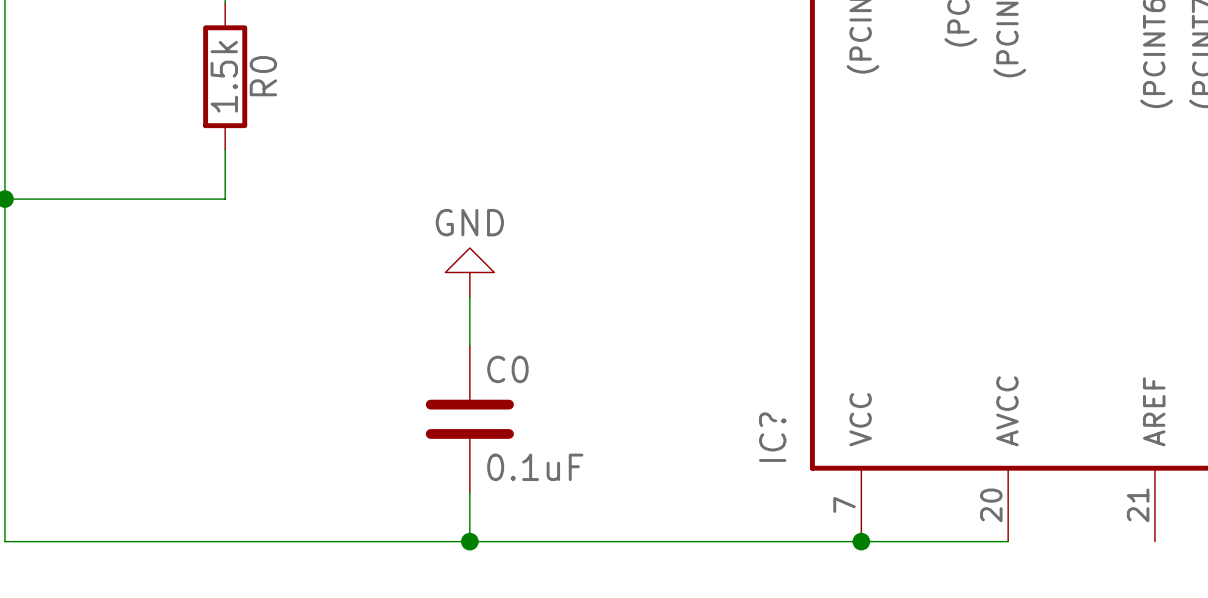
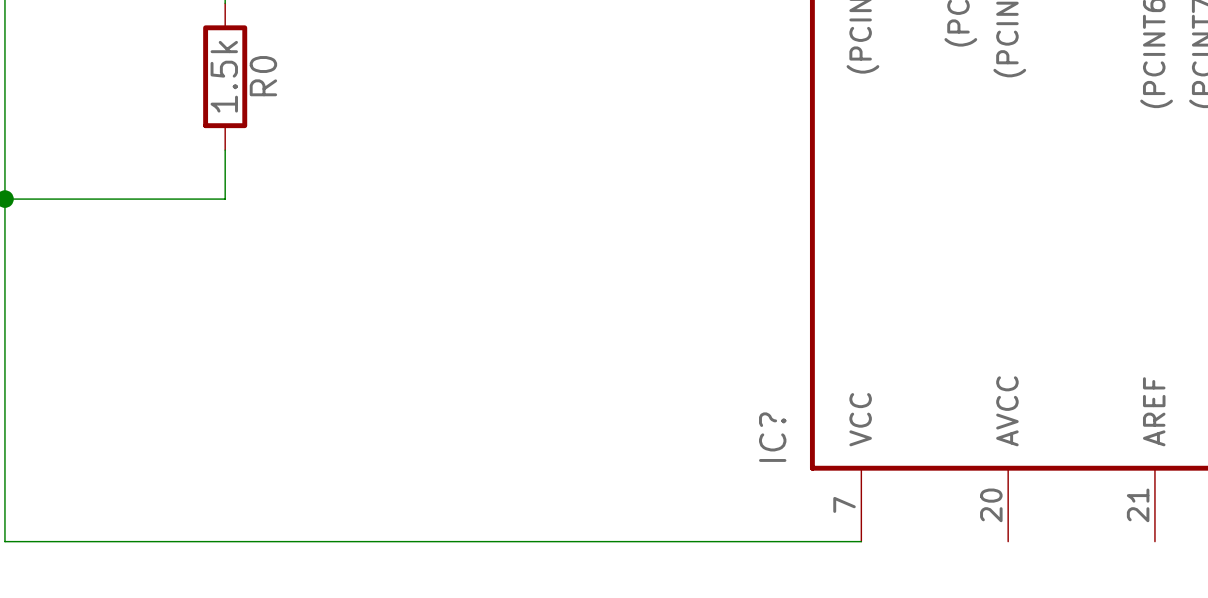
power symbol: GND (469, 272) -> none
wire: (469, 296) (469, 345) -> none
C0: 0.1uF (469, 419) -> none
wire: (469, 492) (469, 541) -> none
junction: (469, 541) -> none
wire: (861, 541) (1008, 541) -> none
junction: (861, 541) -> none

